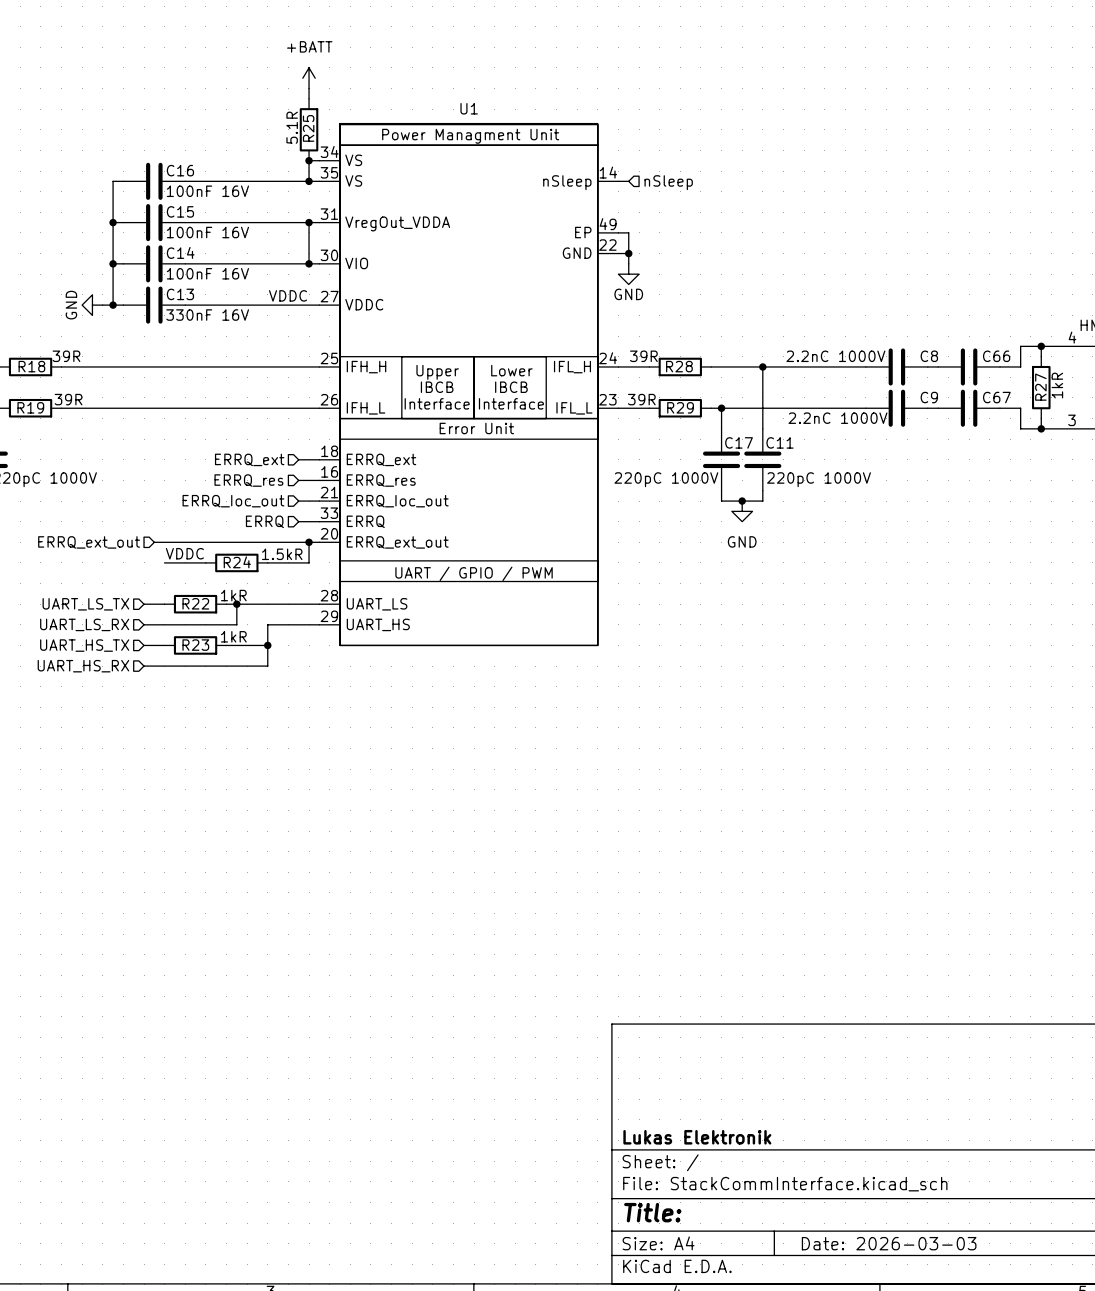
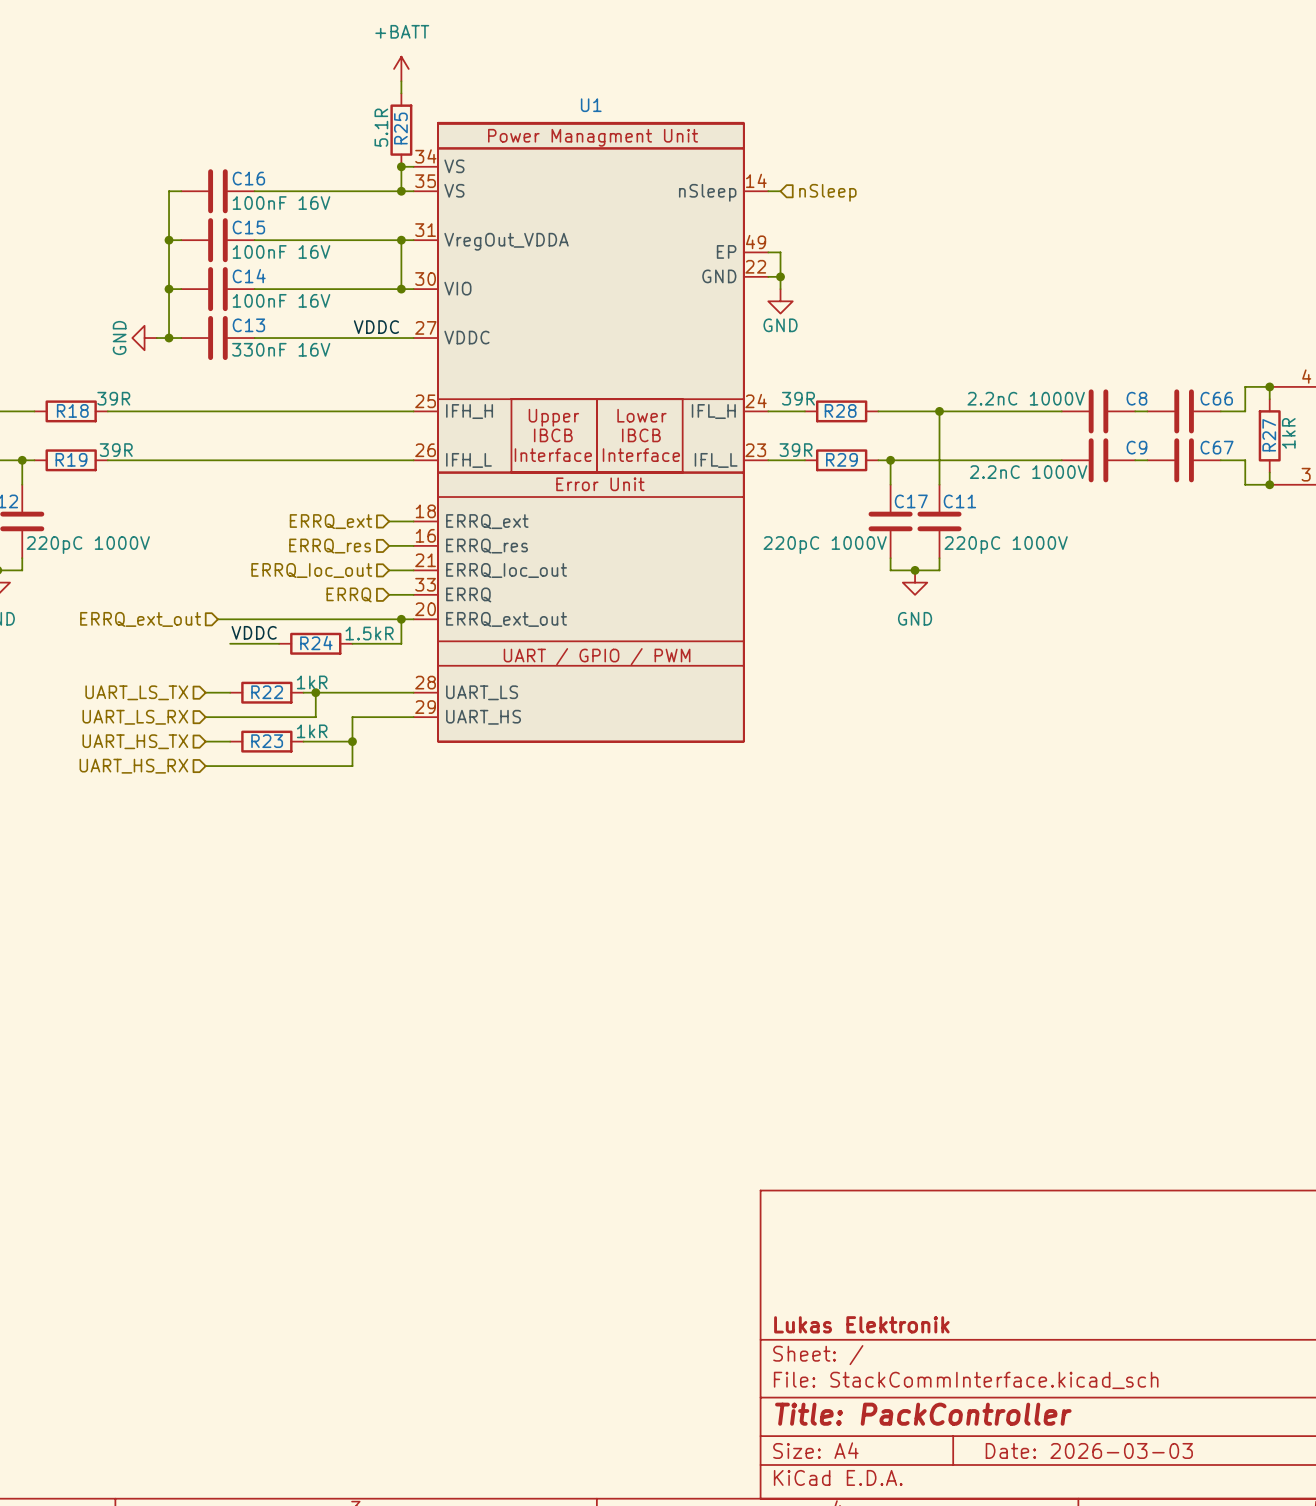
title block: Title: (652, 1212) -> Title: PackController (923, 1414)

